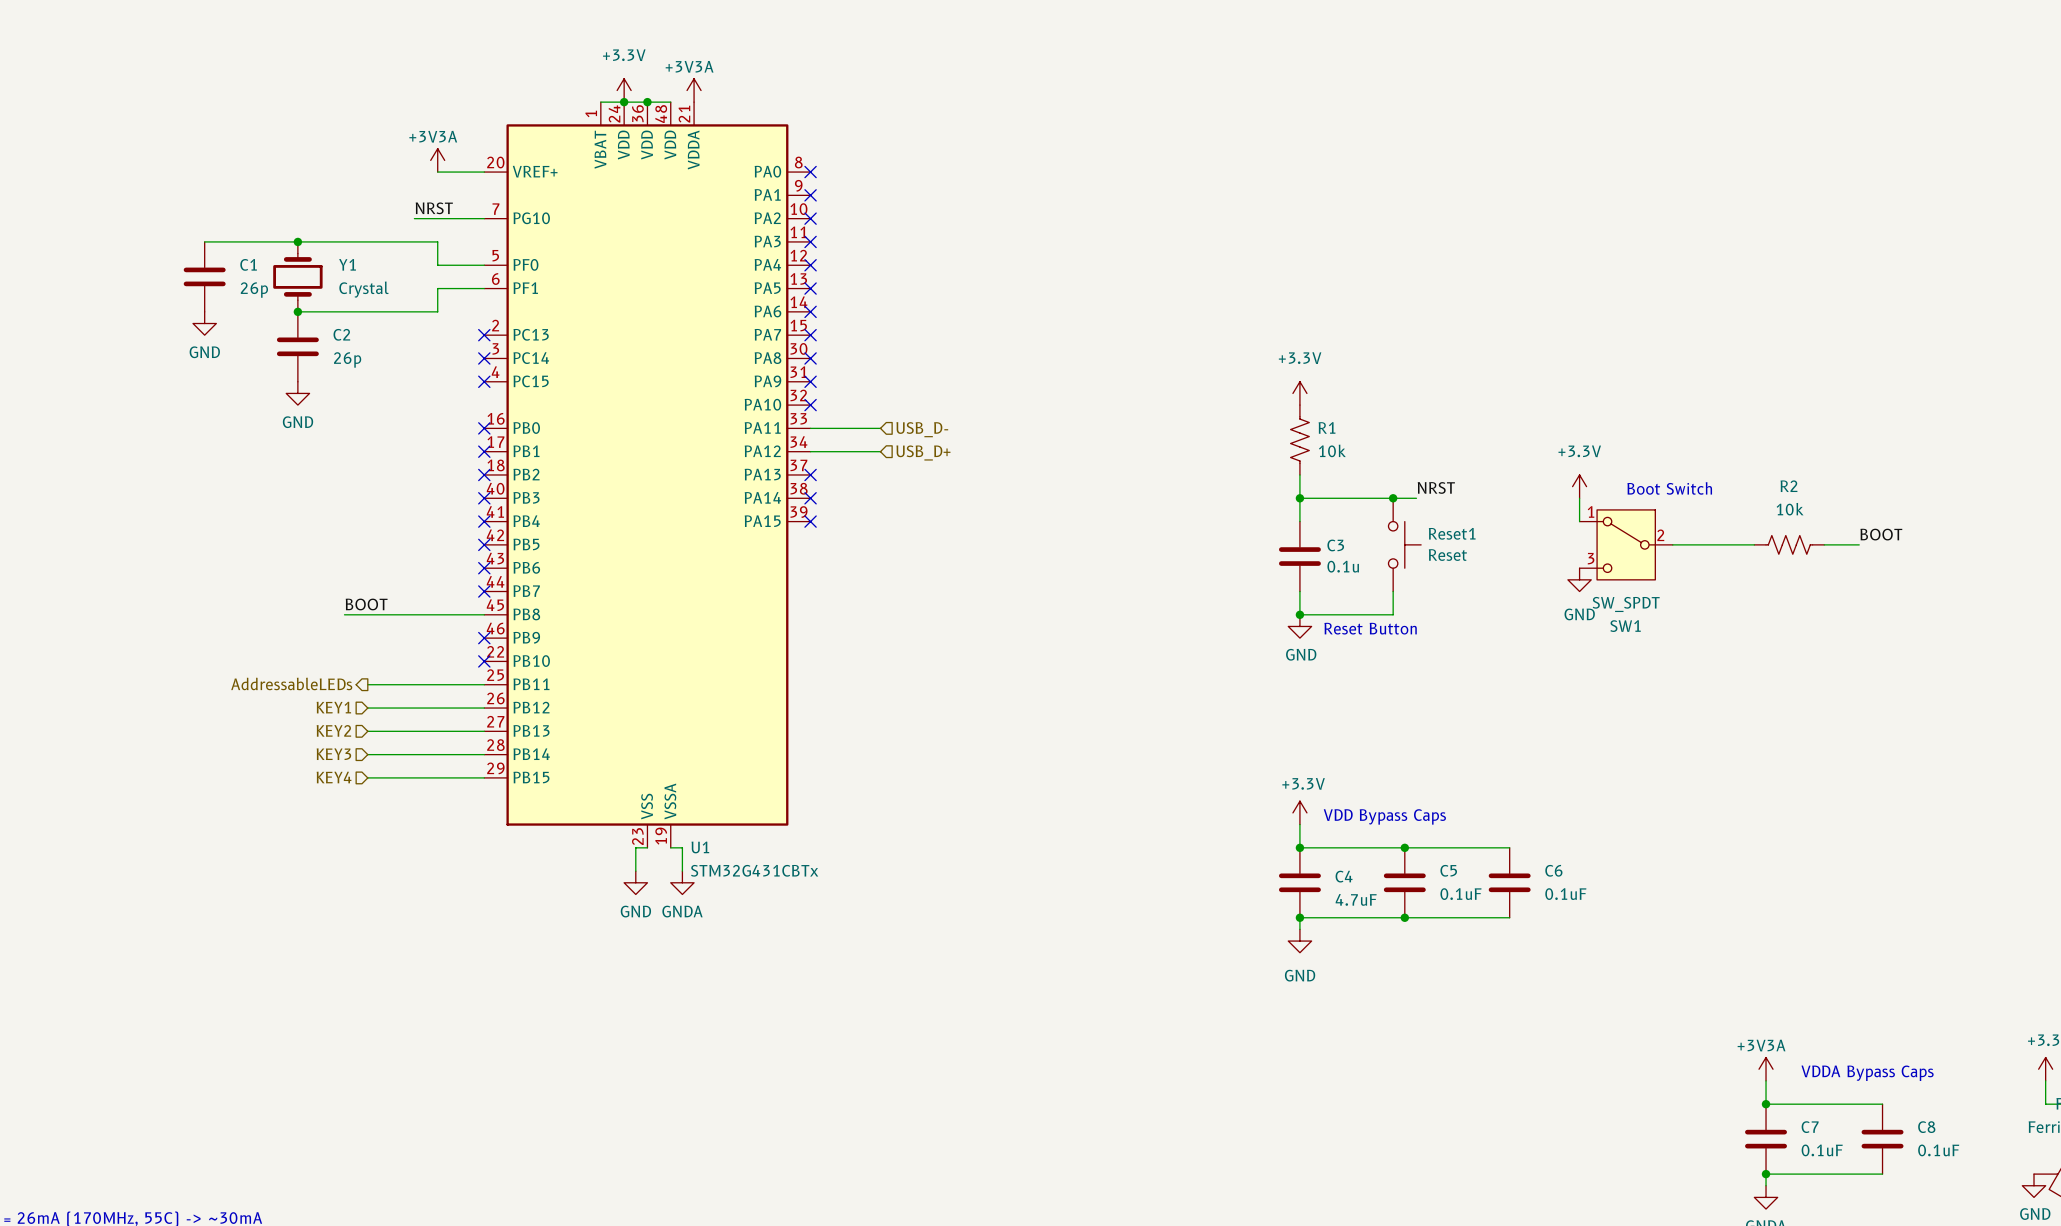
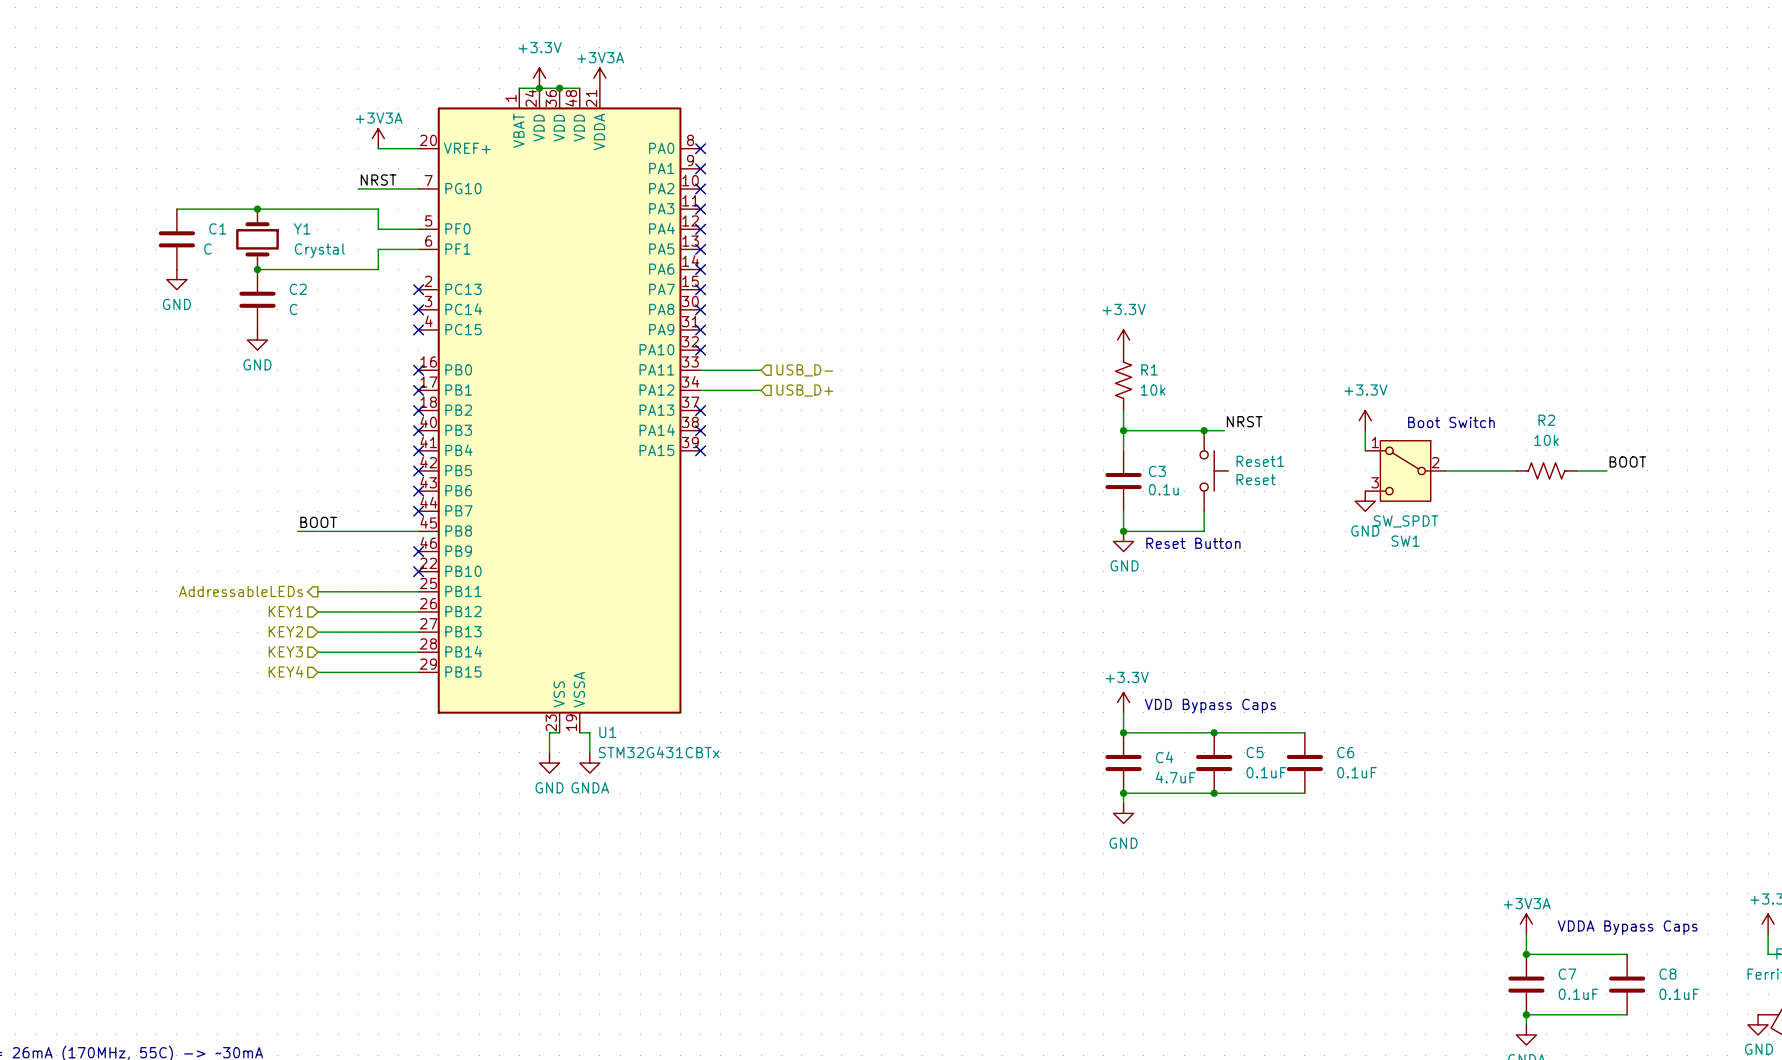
C1 value: 26p (254, 290) -> C (207, 249)
C2 value: 26p (347, 359) -> C (293, 309)

